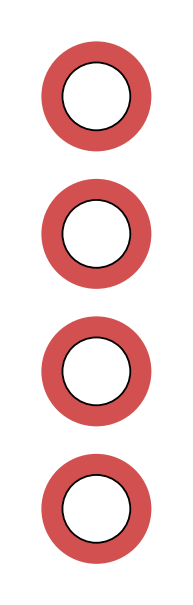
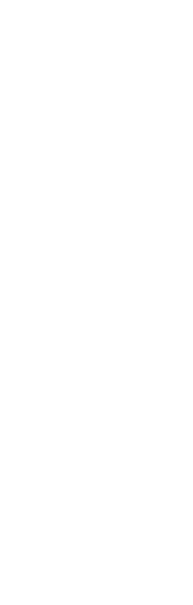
part: (96, 96) -> none
part: (96, 233) -> none
part: (96, 371) -> none
part: (96, 508) -> none

